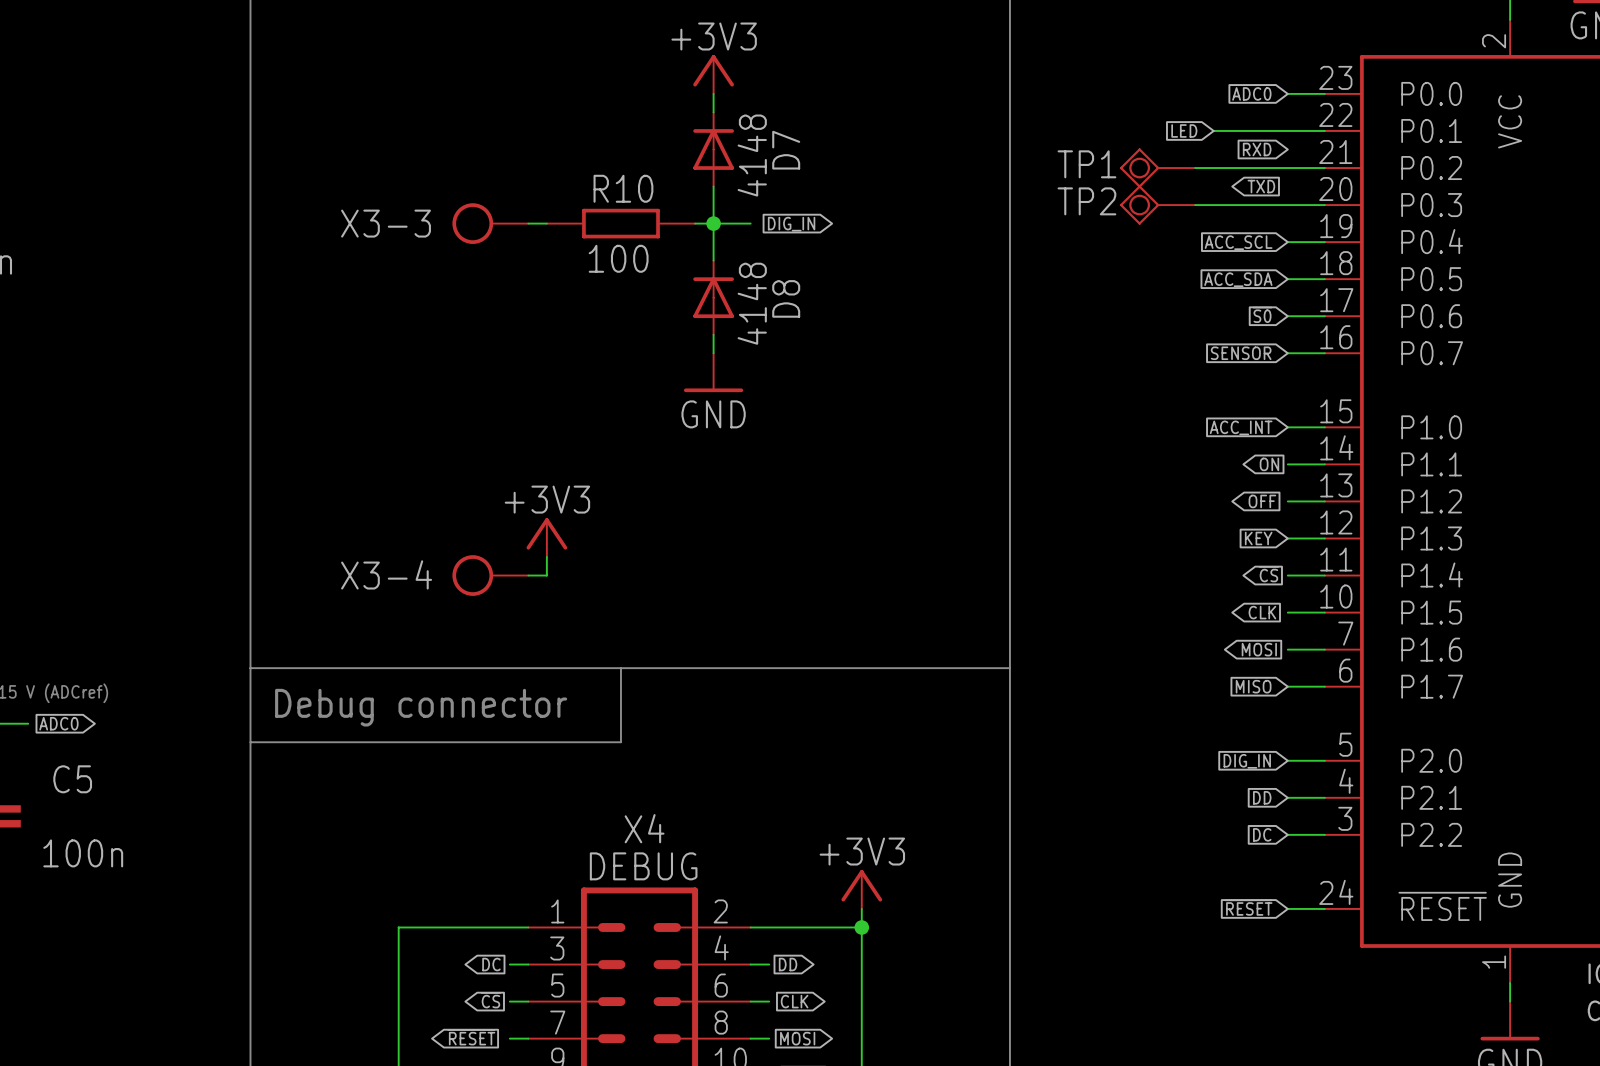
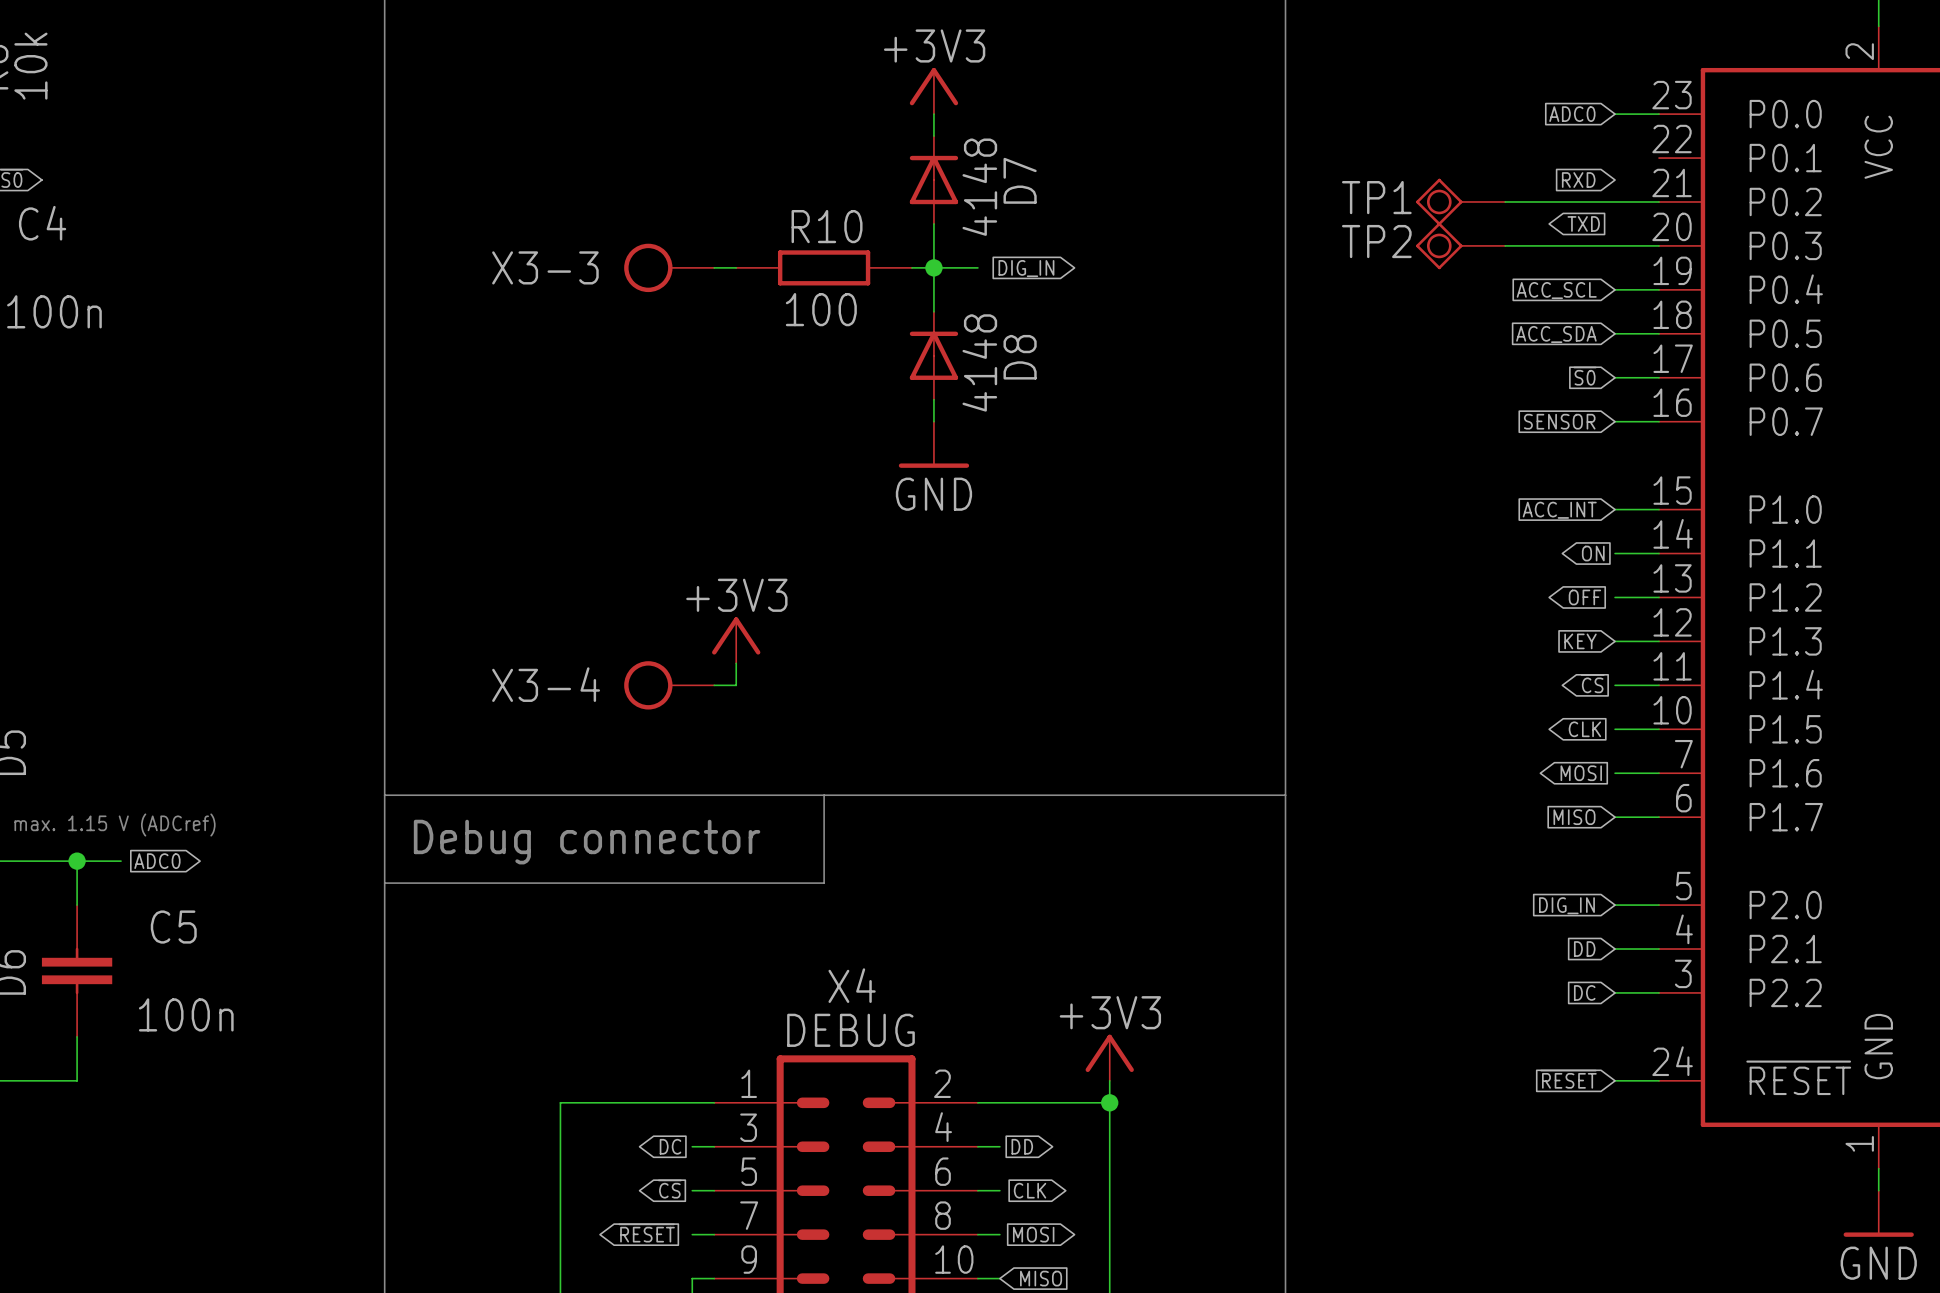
global label: LED (1184, 130) -> none
wire: (1213, 130) (1324, 130) -> none

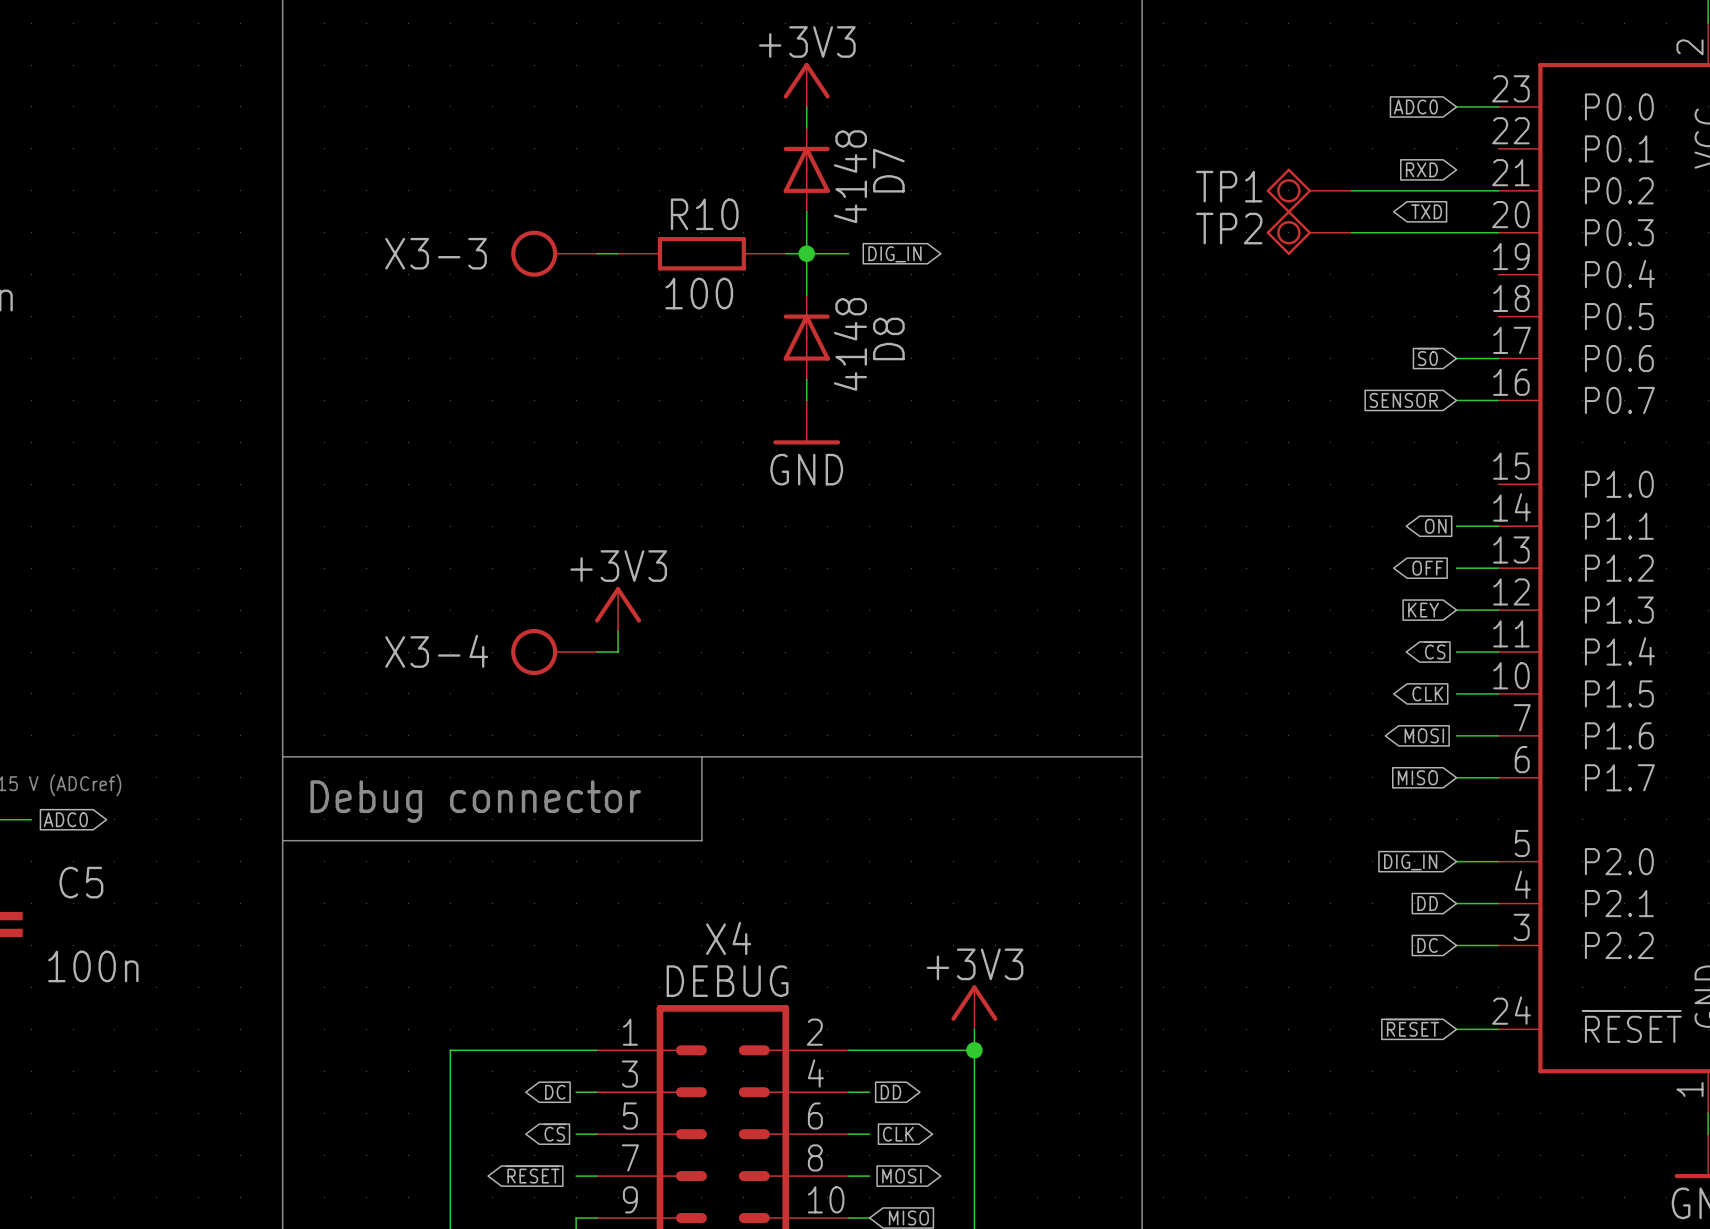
wire: (1615, 289) (1659, 289) -> none
global label: ACC_SCL (1556, 290) -> none
wire: (1615, 333) (1659, 333) -> none
global label: ACC_SDA (1556, 334) -> none
wire: (1615, 509) (1659, 509) -> none
global label: ACC_INT (1559, 510) -> none

